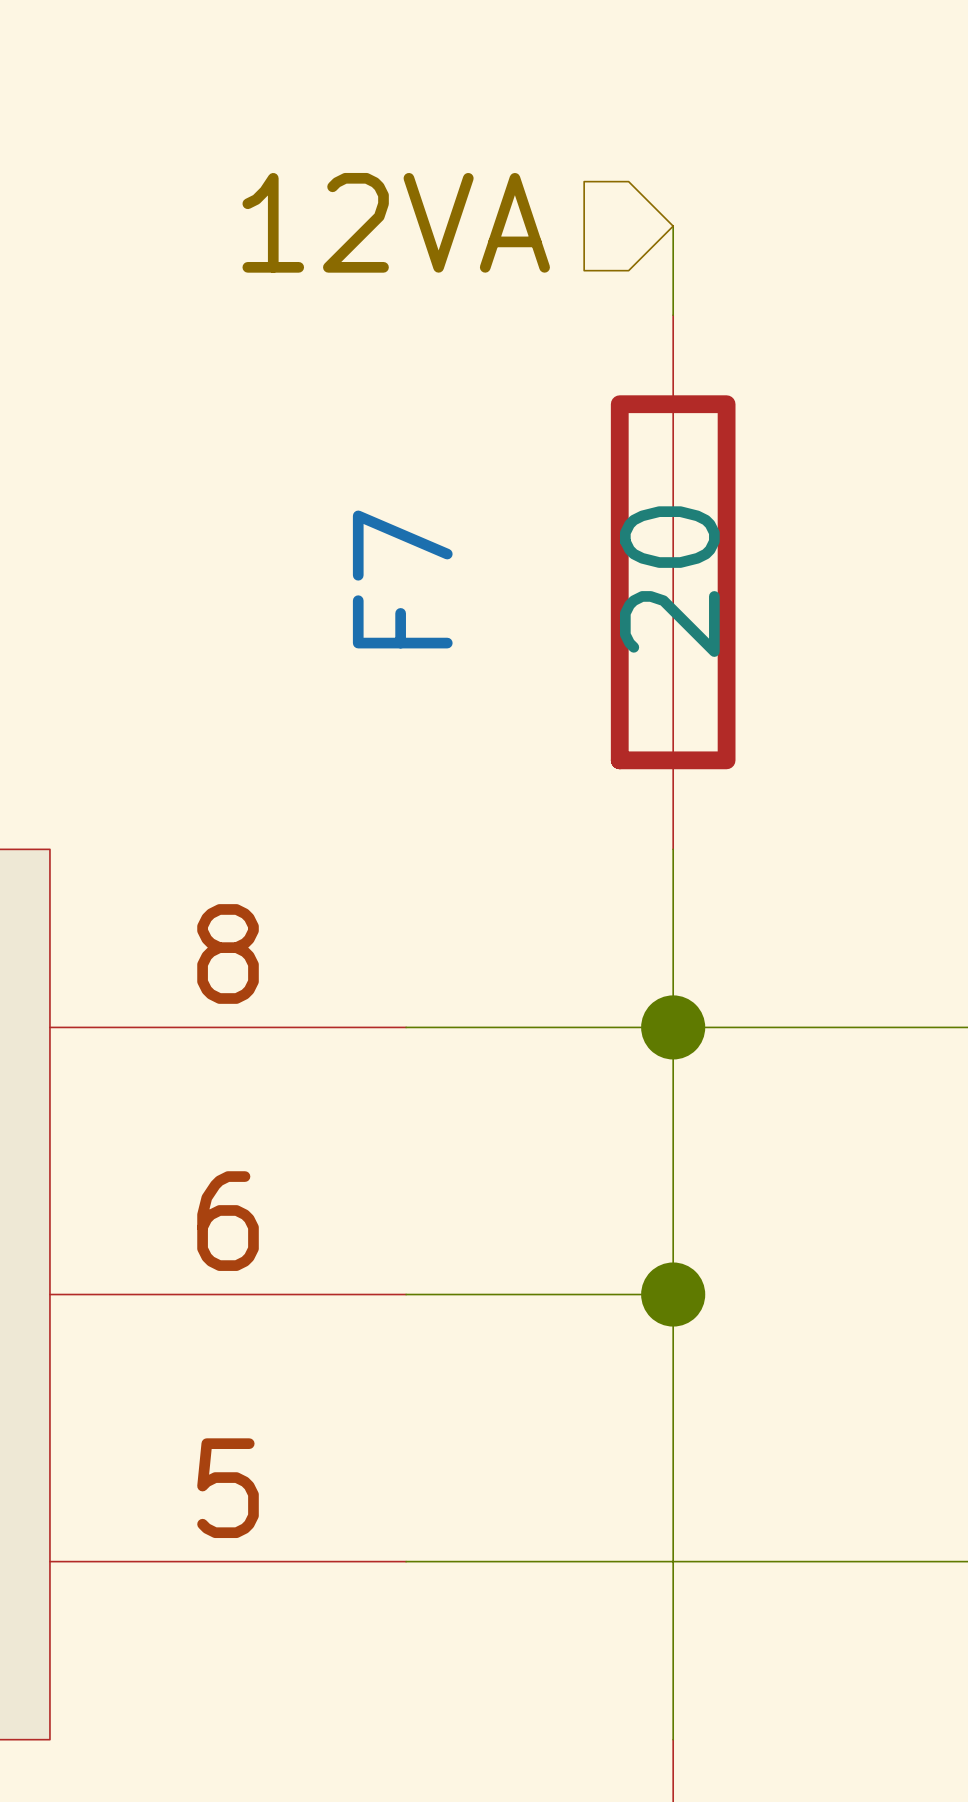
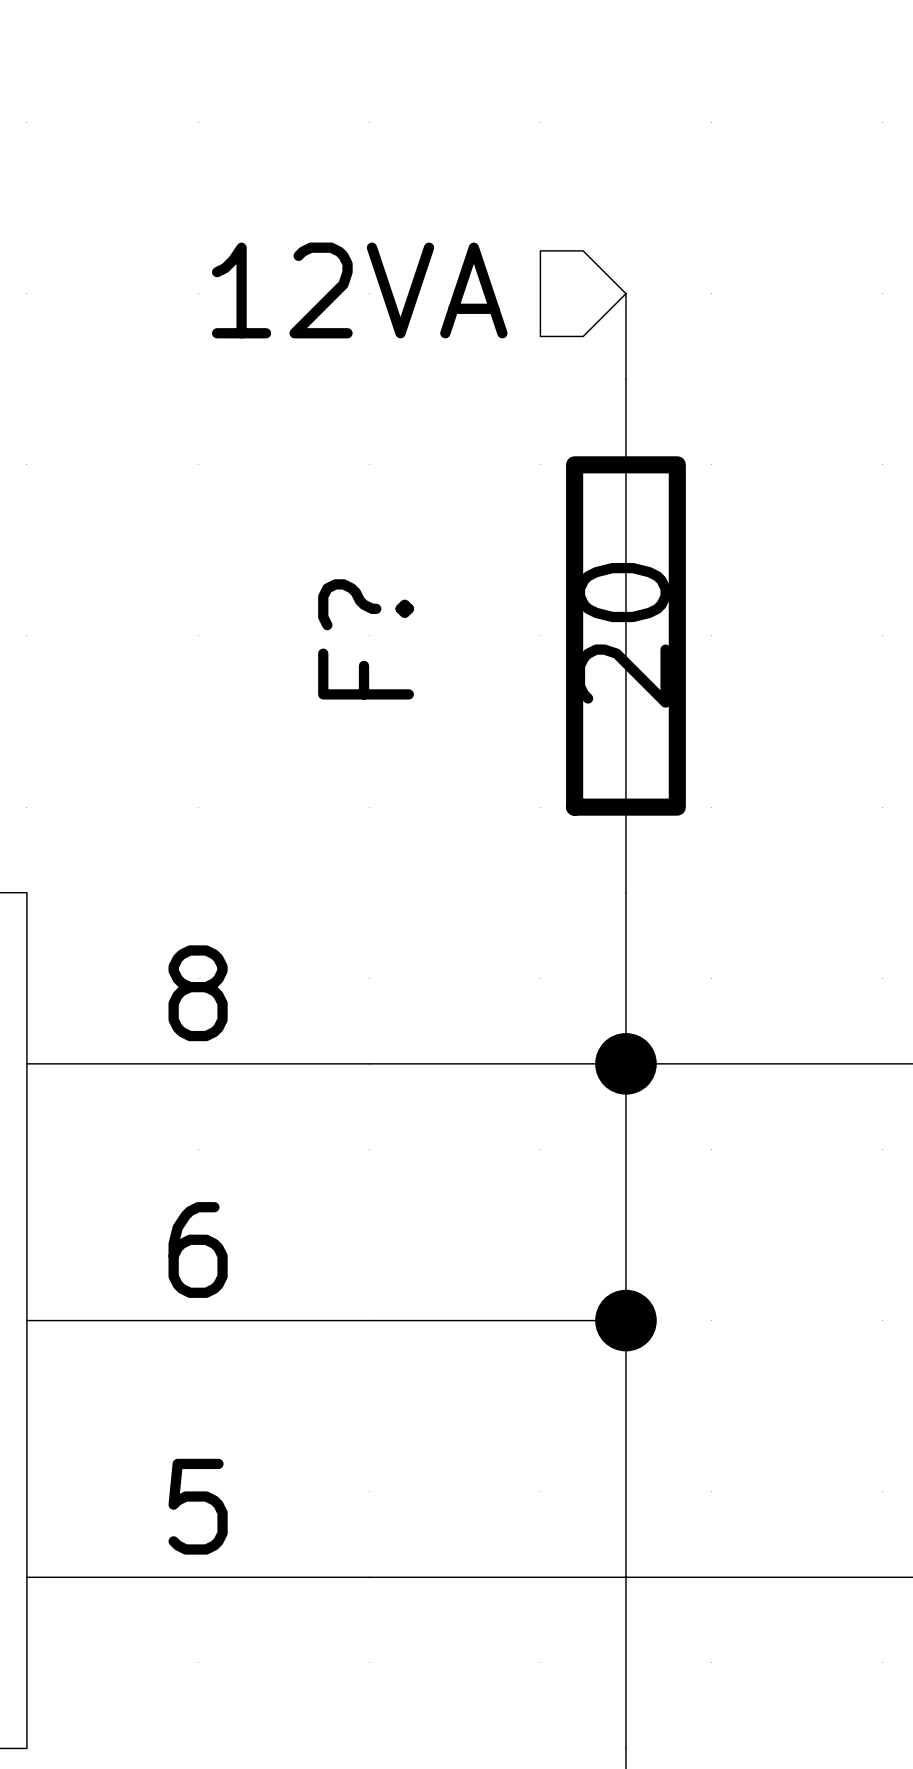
F7 name: F7 (402, 579) -> F? (366, 639)

